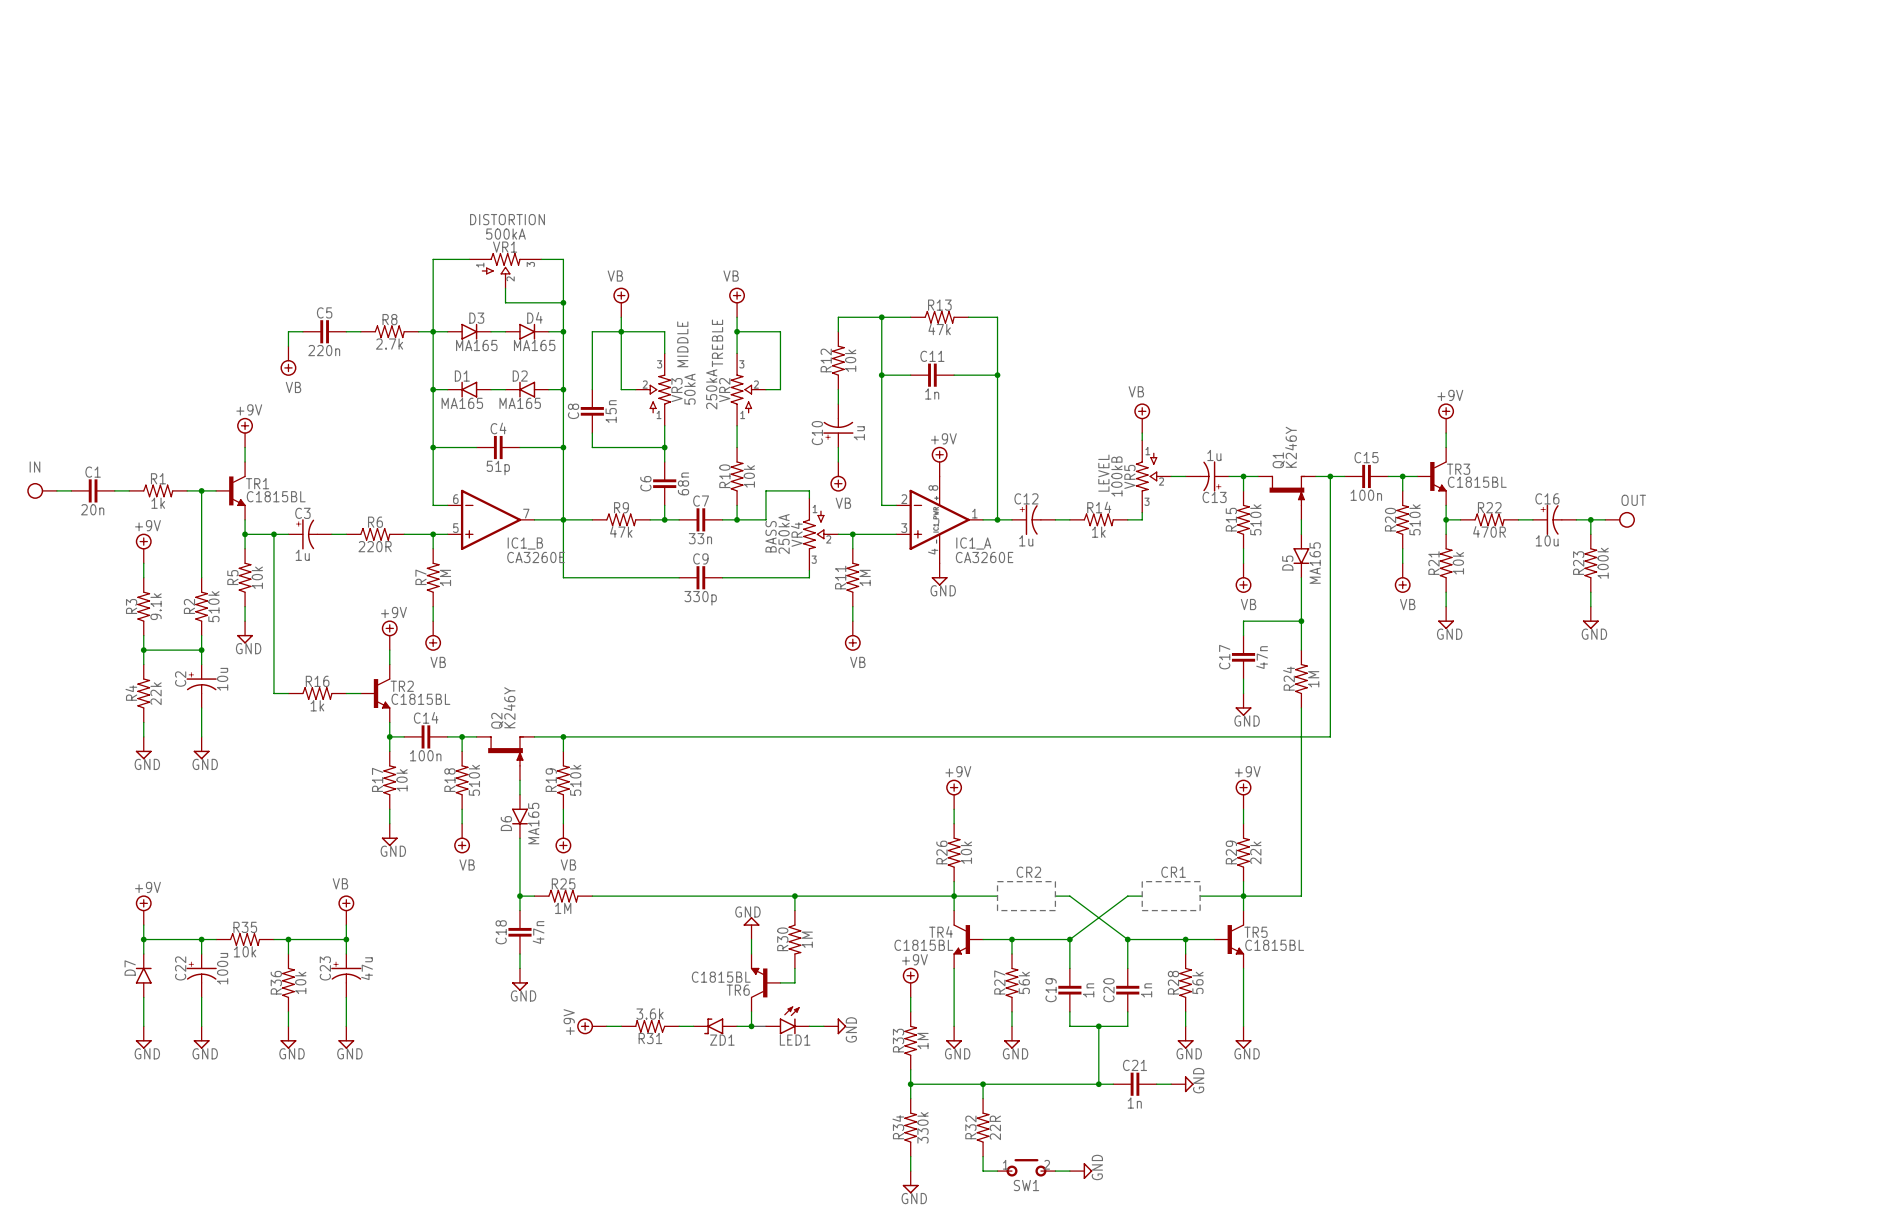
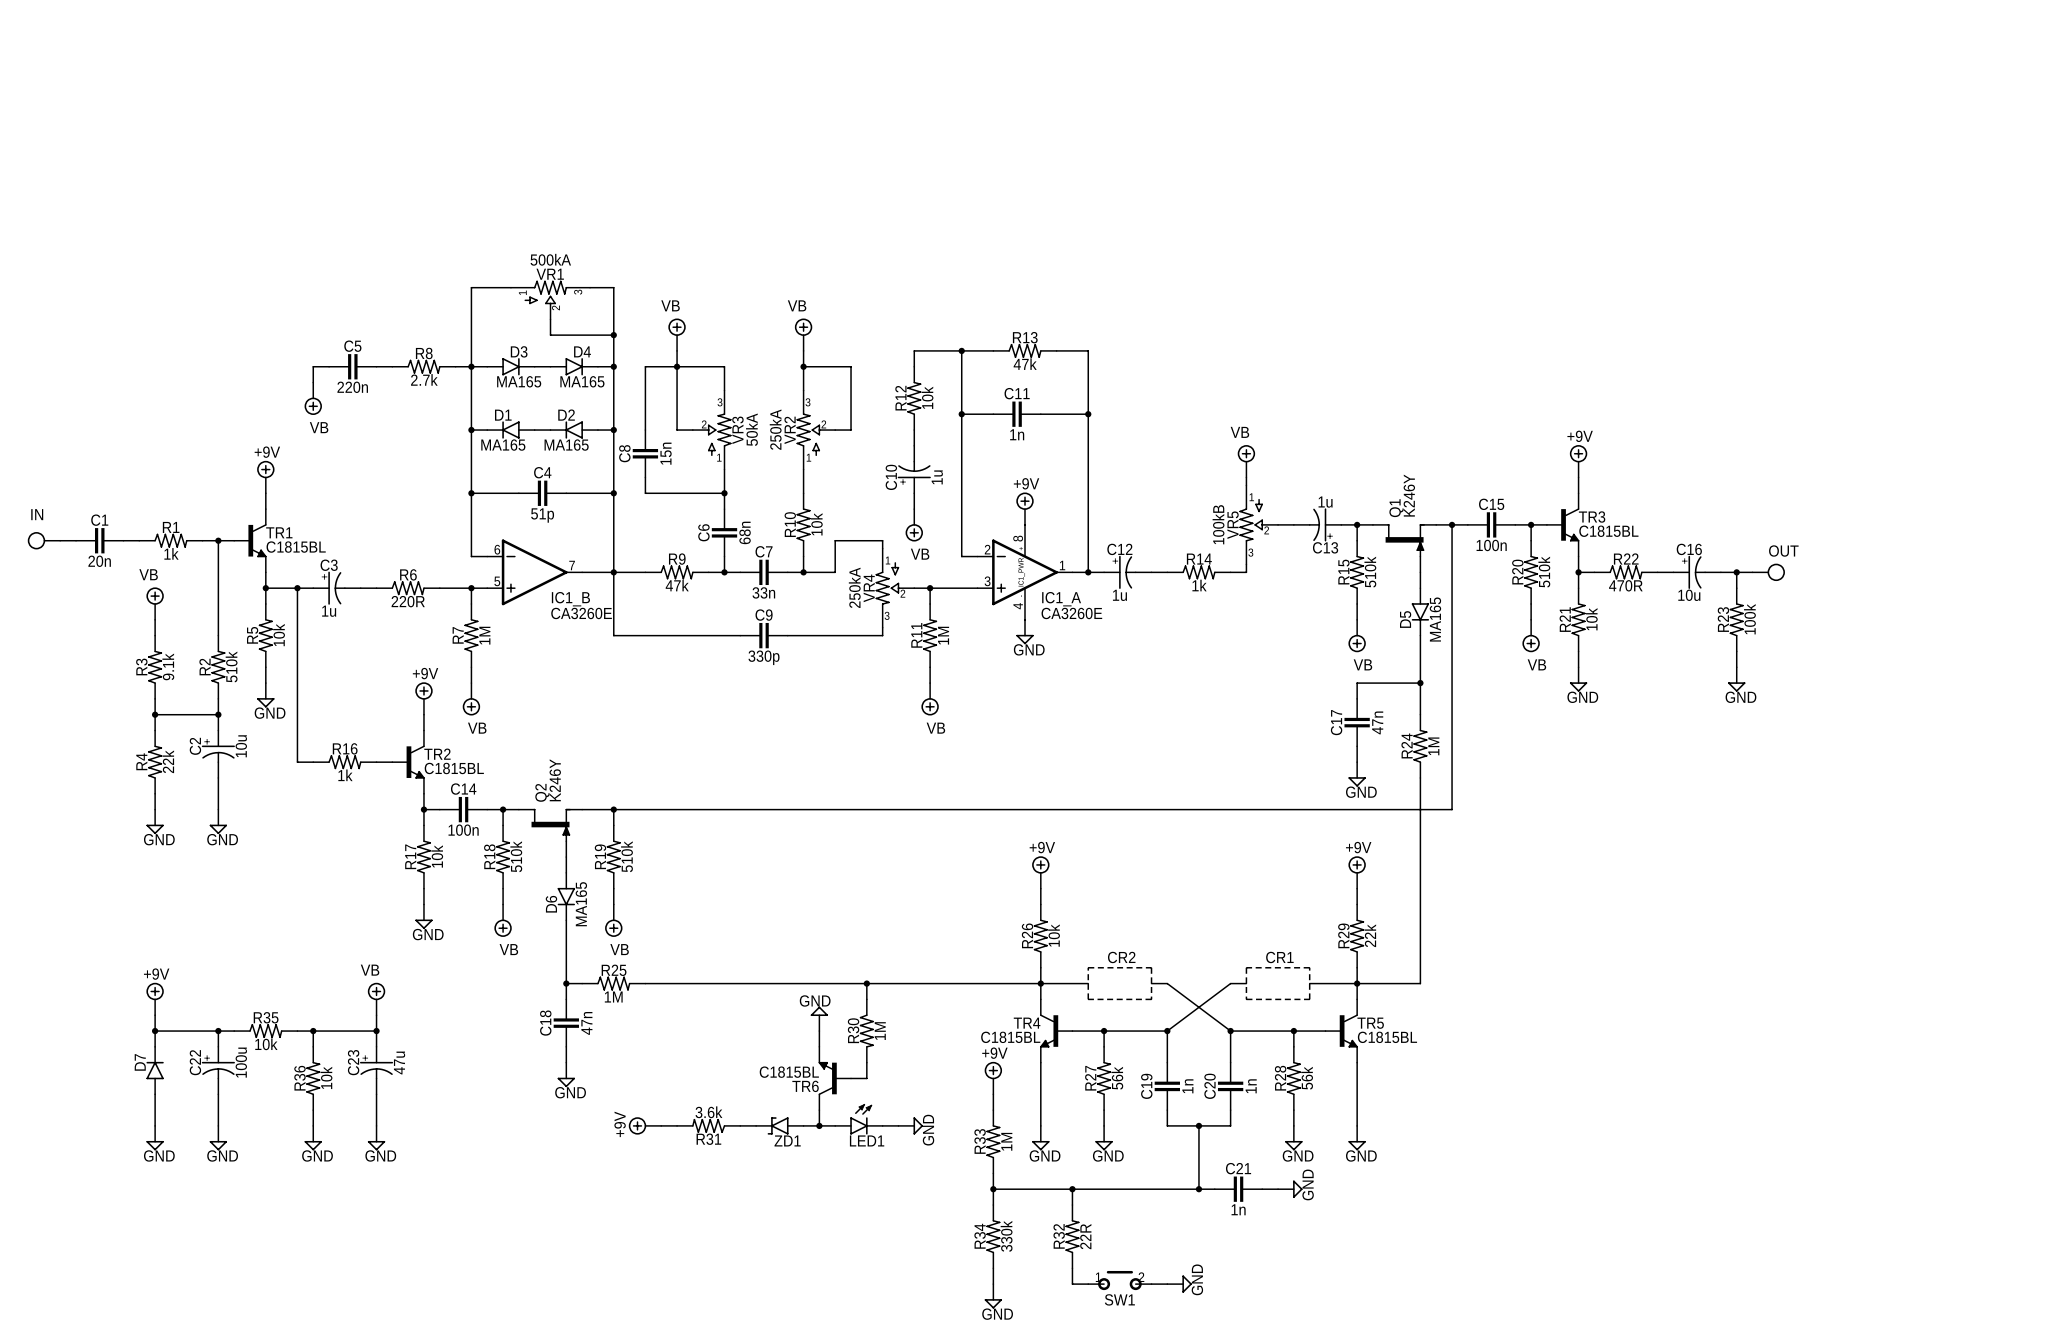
text: DISTORTION (507, 219) -> none
text: TREBLE (717, 343) -> none
text: MIDDLE (682, 344) -> none
text: LEVEL (1103, 473) -> none
text: BASS (771, 536) -> none
power symbol: +9V (143, 548) -> VB (155, 603)

